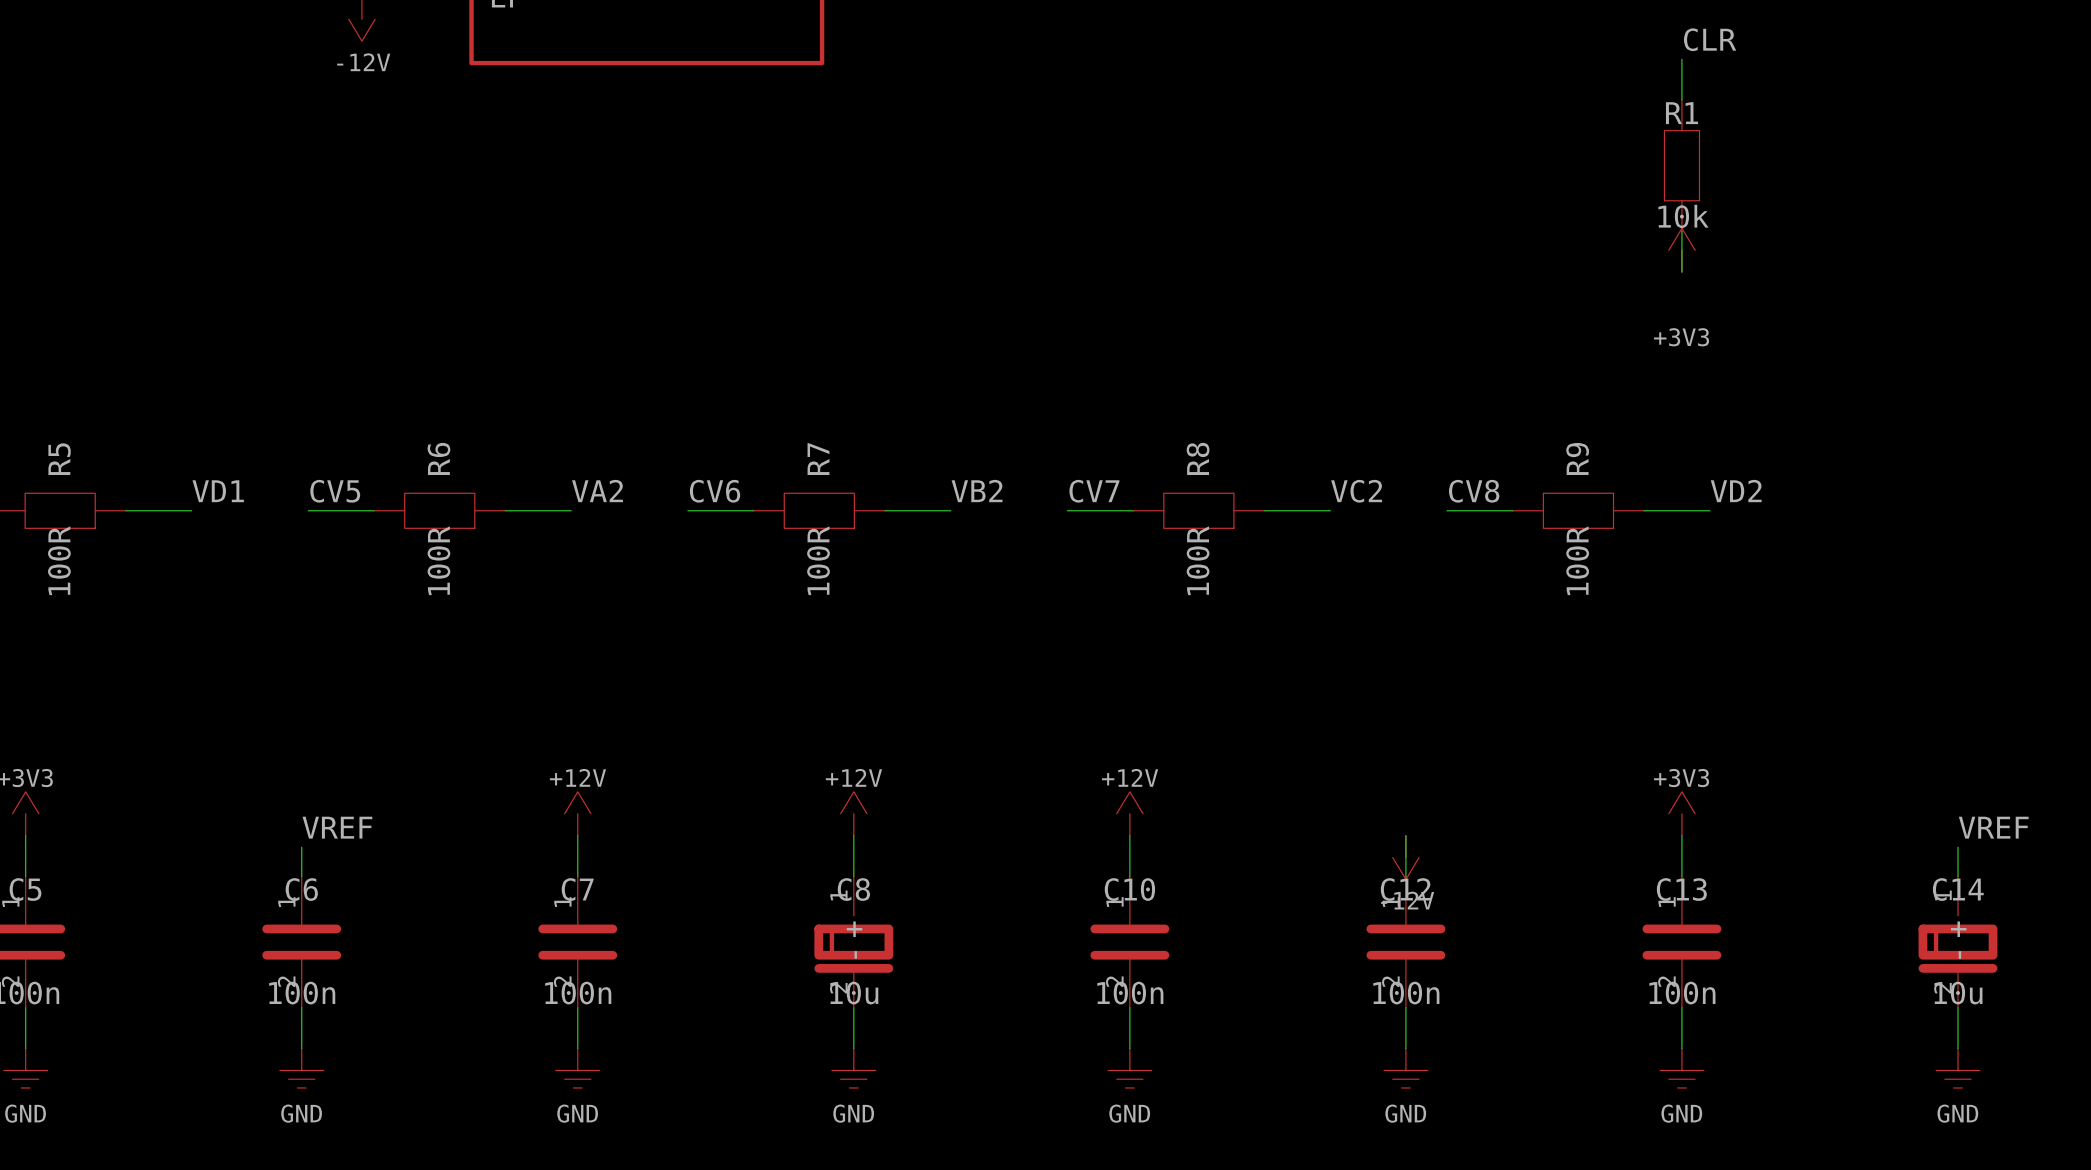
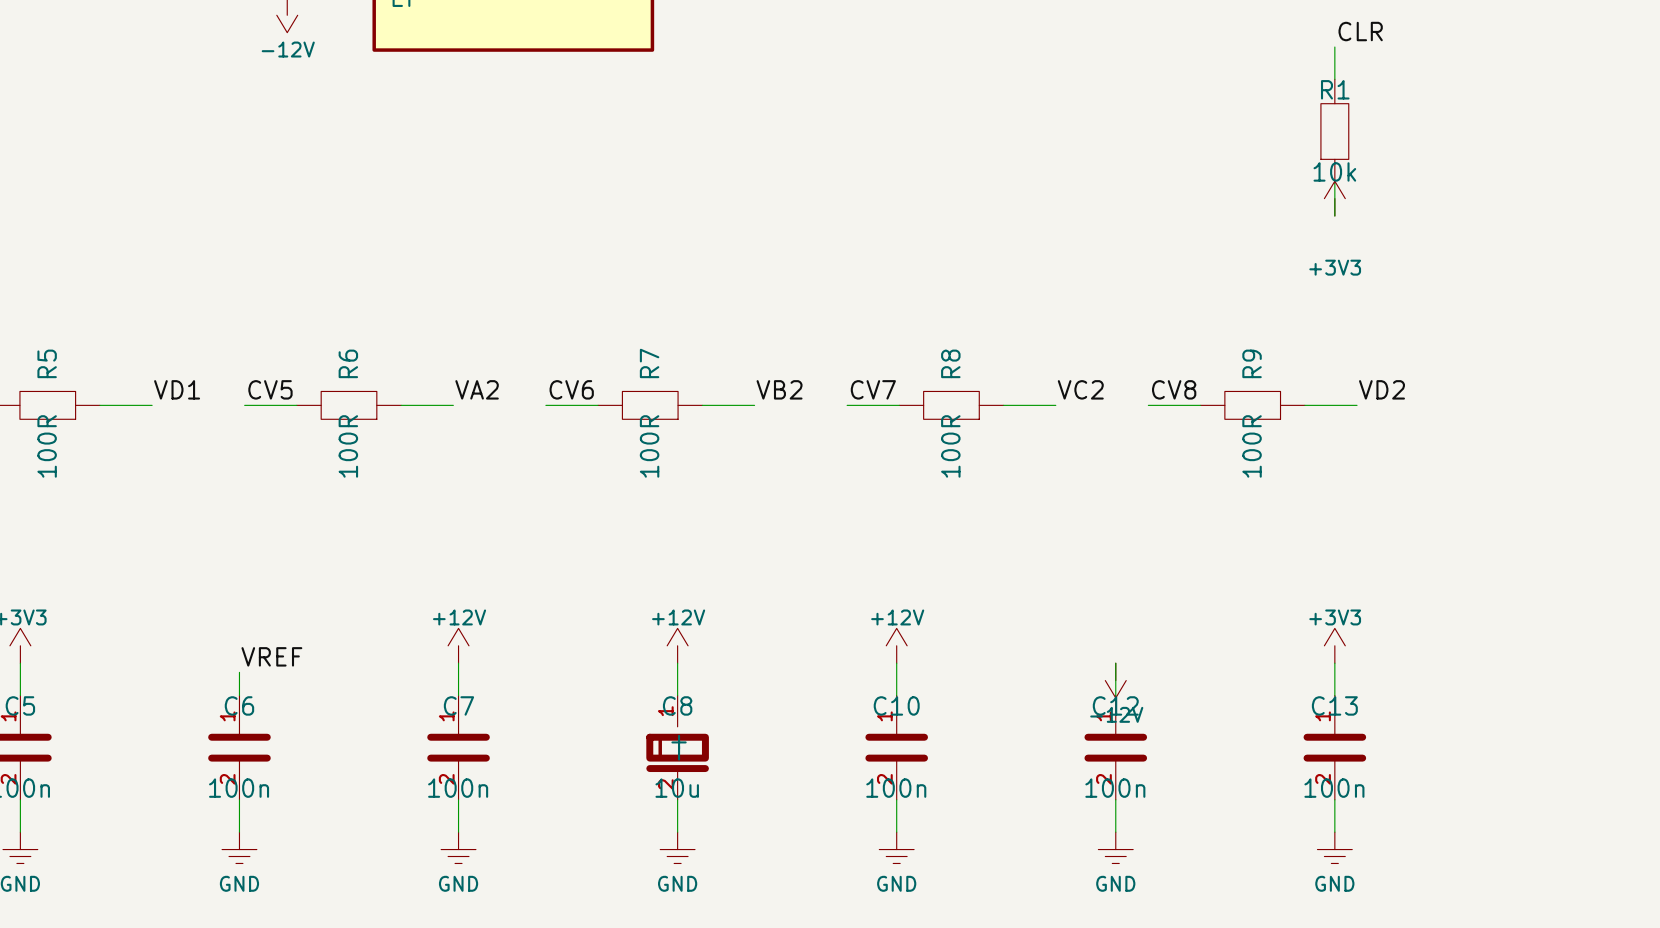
label: VREF (1993, 827) -> none
wire: (1958, 847) (1958, 876) -> none
C14: 10u (1958, 942) -> none
wire: (1958, 1007) (1958, 1048) -> none
power symbol: GND (1958, 1068) -> none

